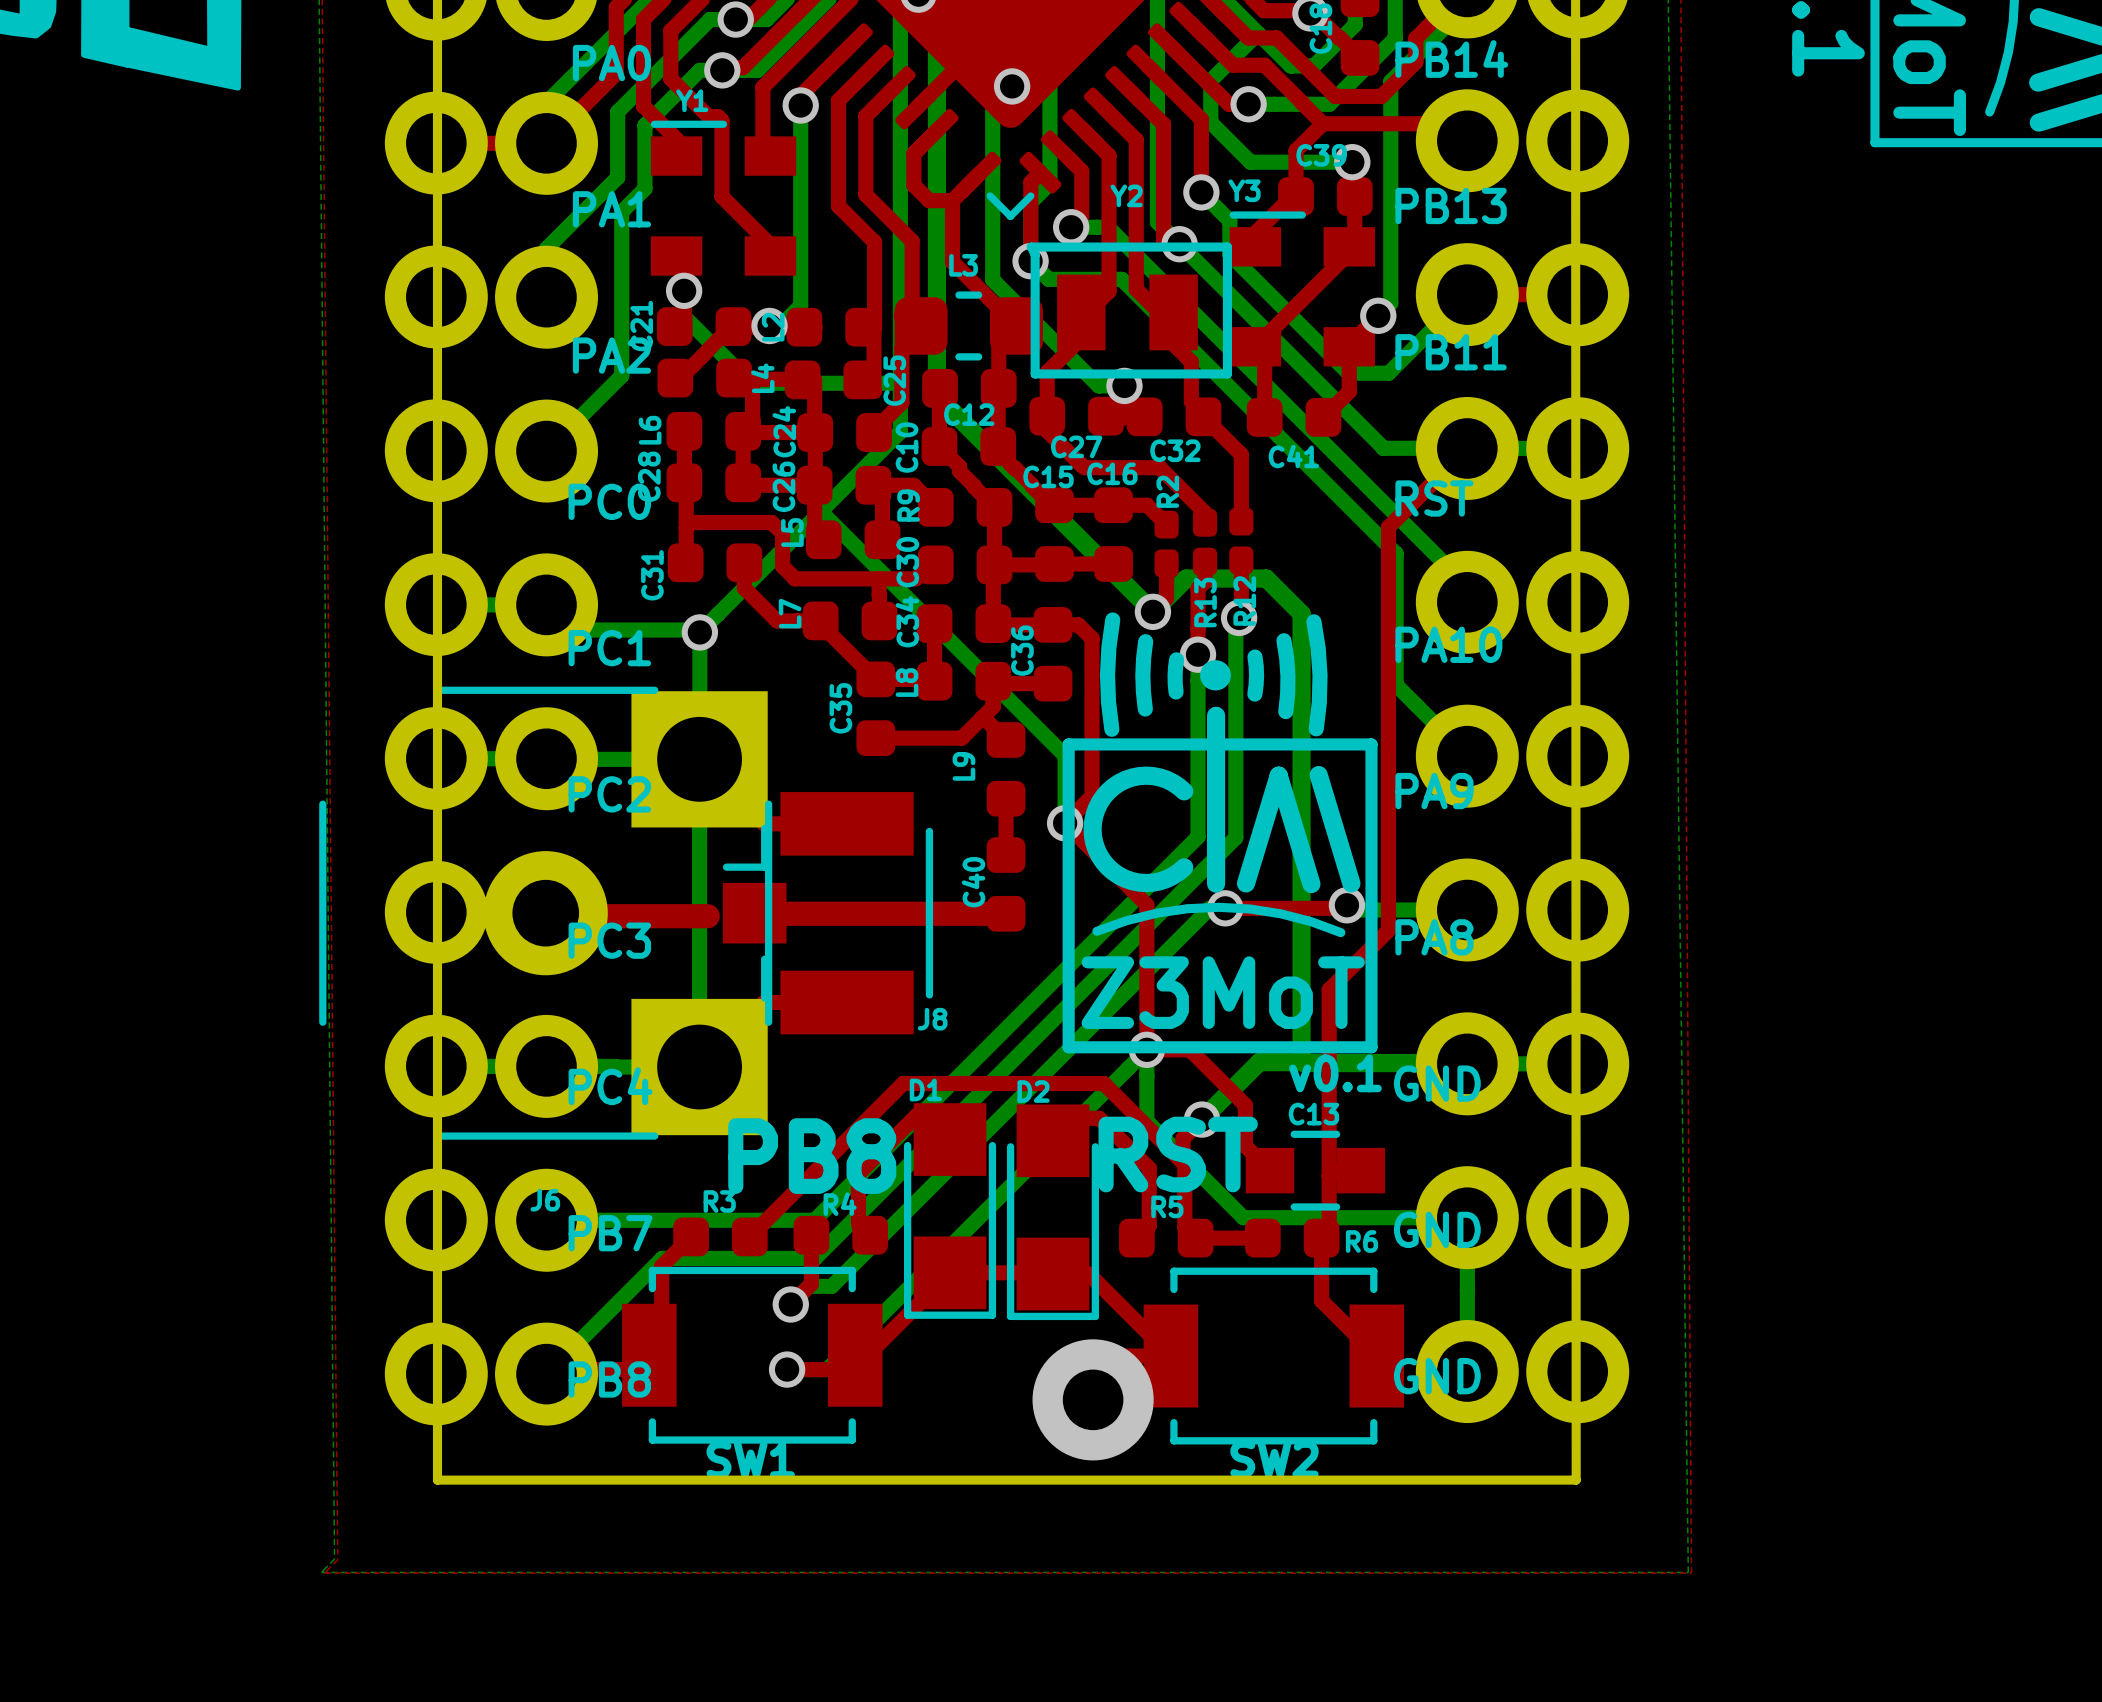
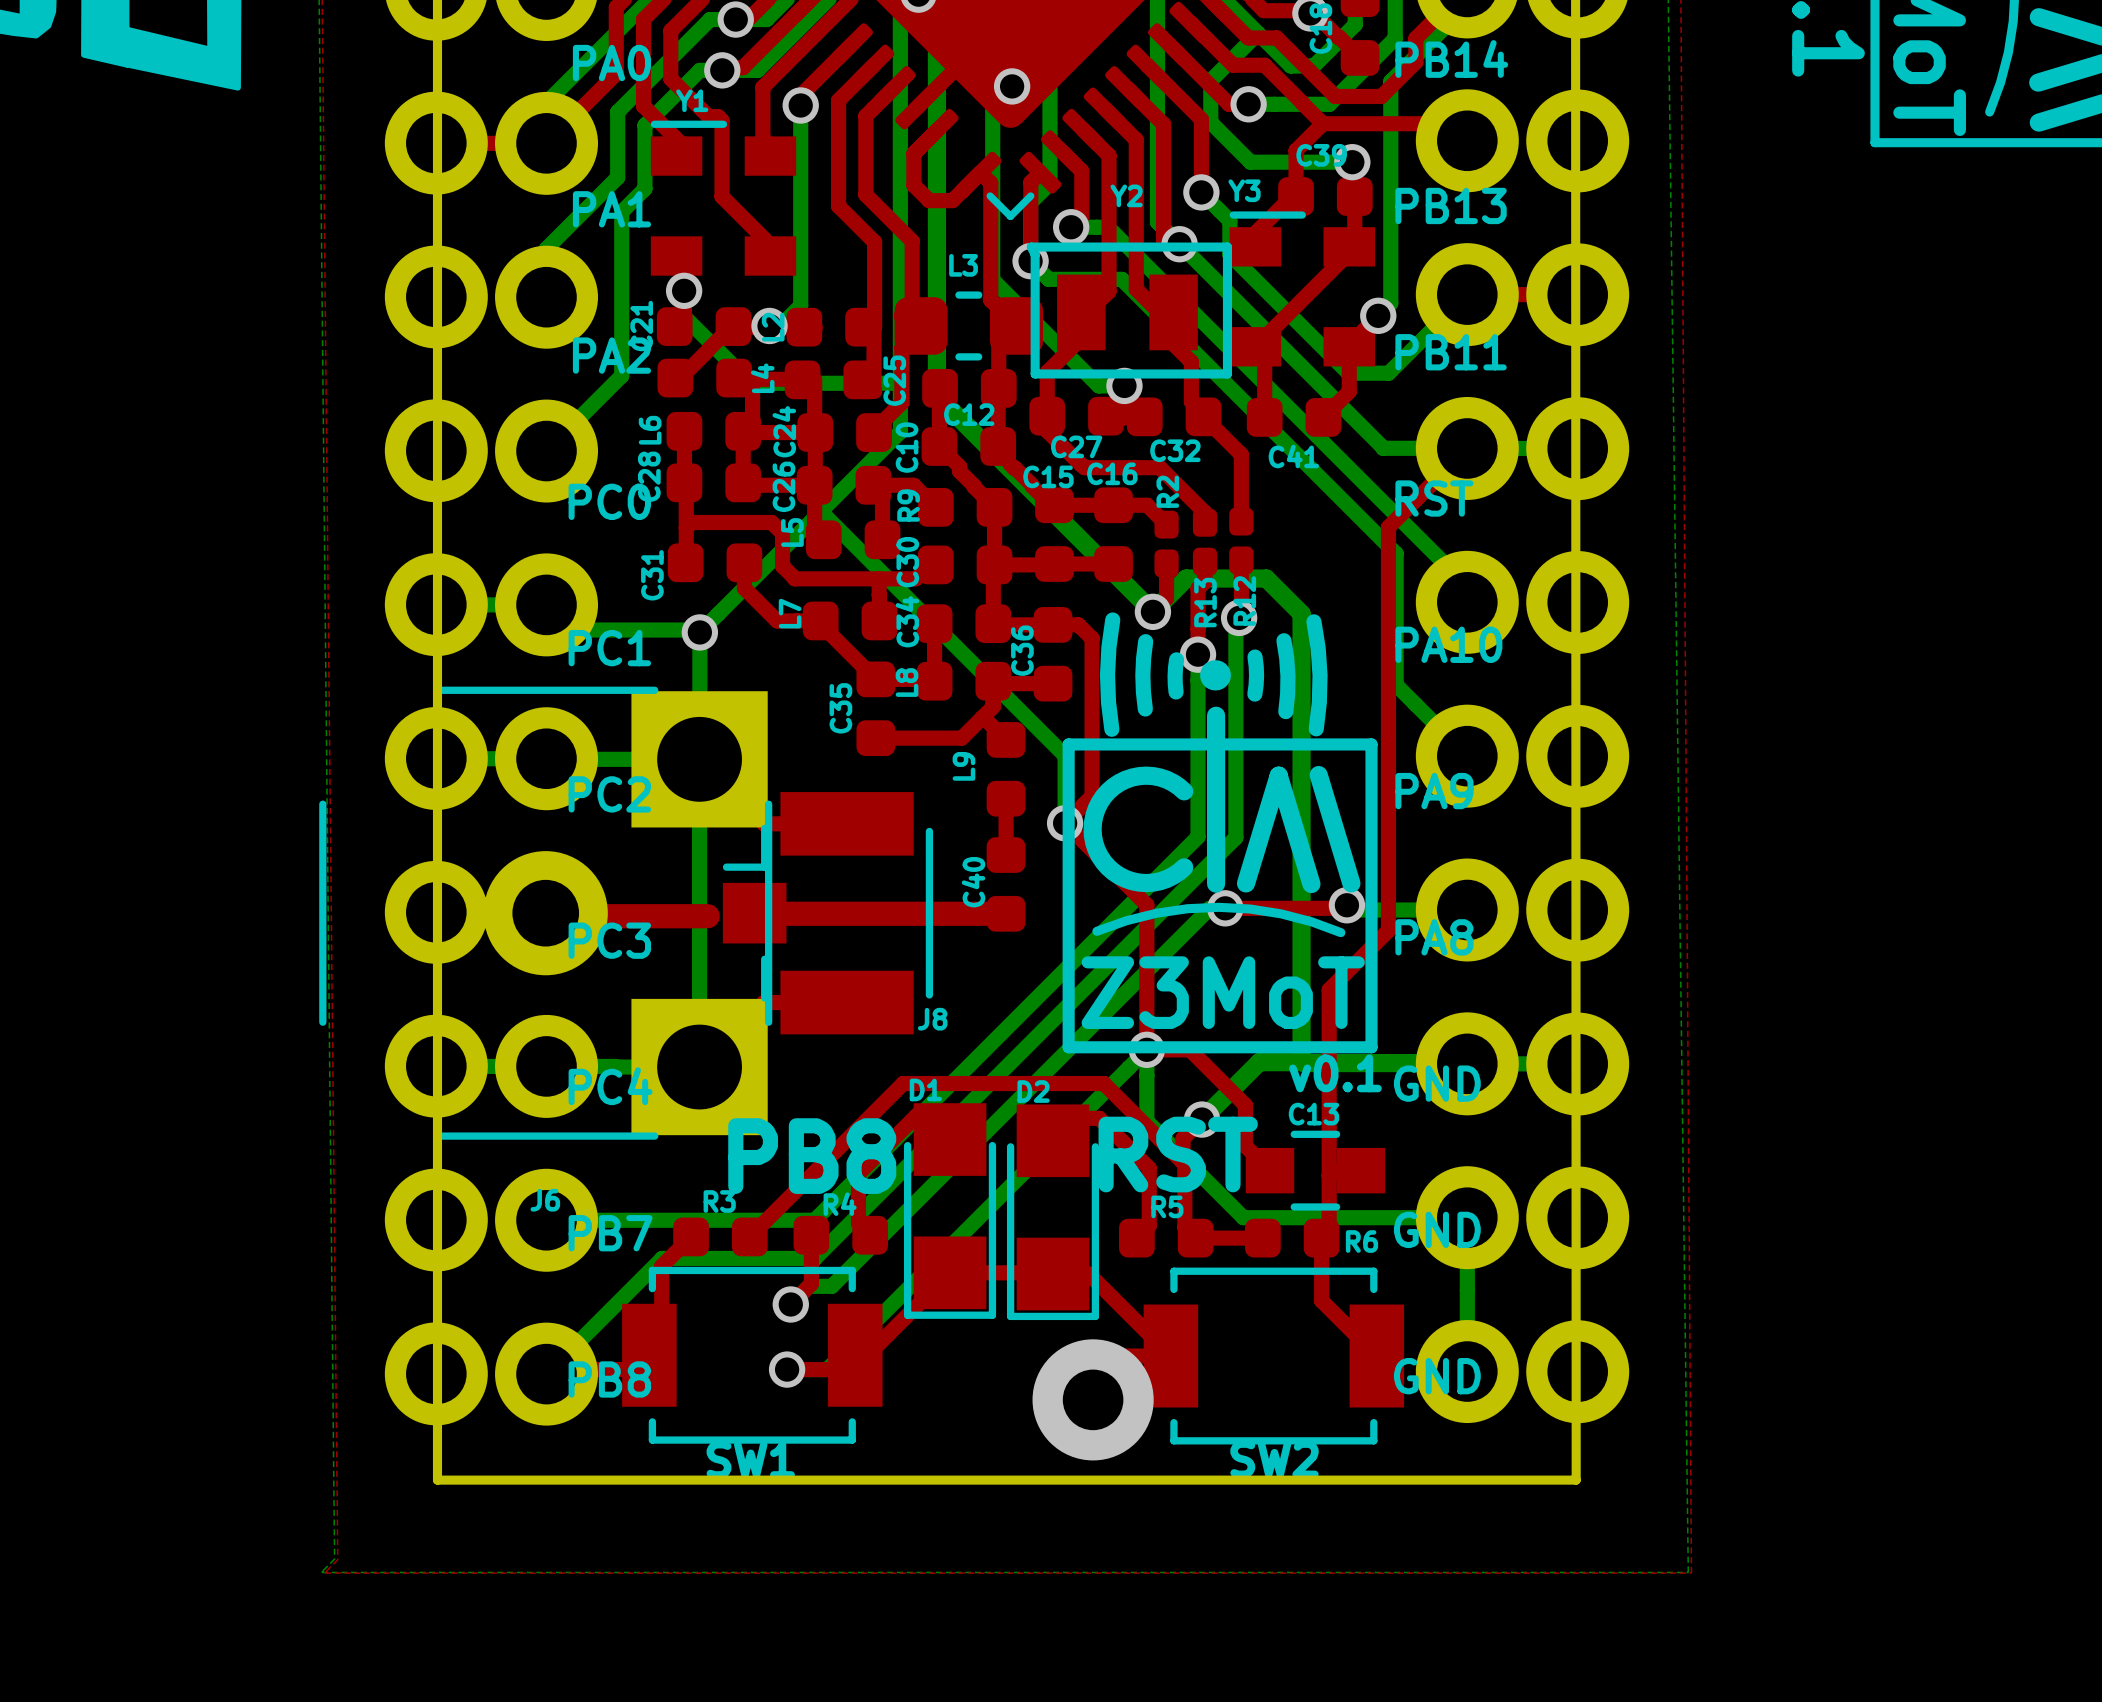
top track: (952, 200) (952, 261) (990, 300) -> (980, 172) (990, 182) (990, 300)

